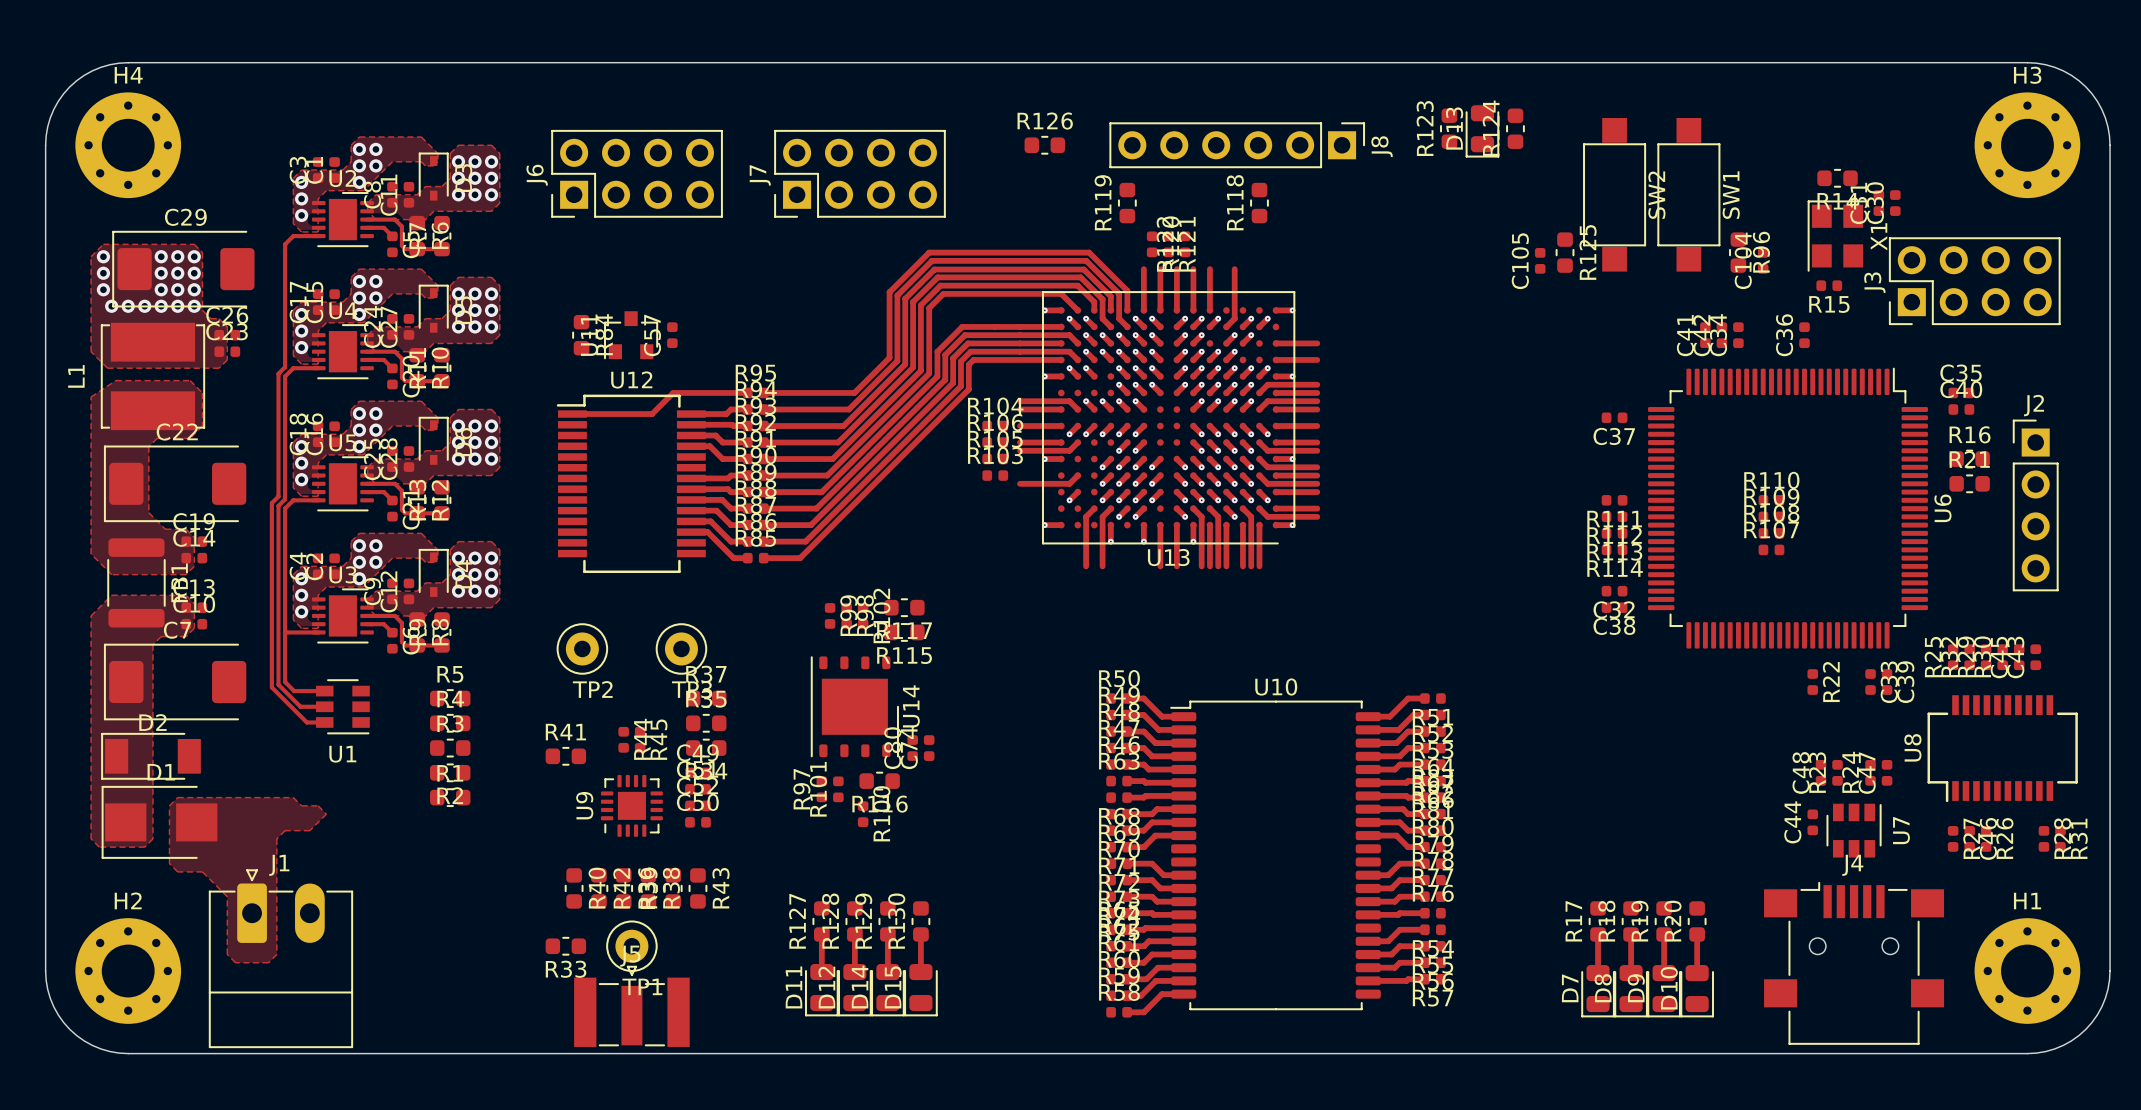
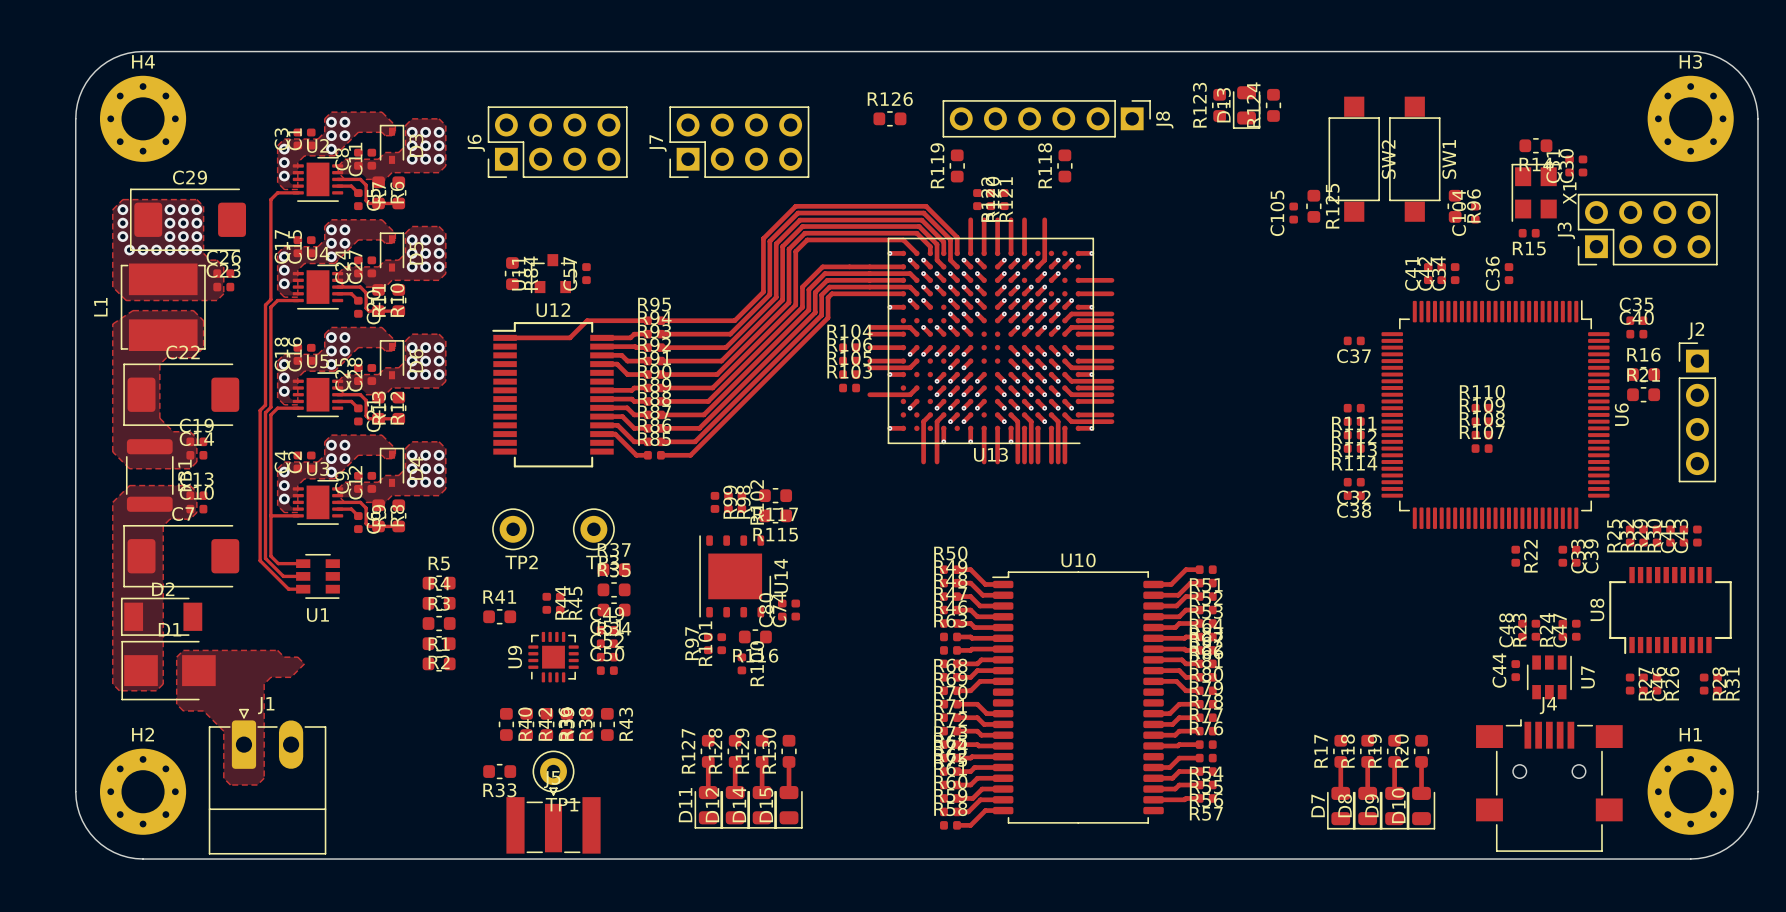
R5 position: (450, 698) -> (439, 583)
R4 position: (450, 723) -> (439, 603)
R3 position: (450, 748) -> (439, 623)
R2 position: (450, 772) -> (439, 643)
R1 position: (450, 797) -> (439, 663)

